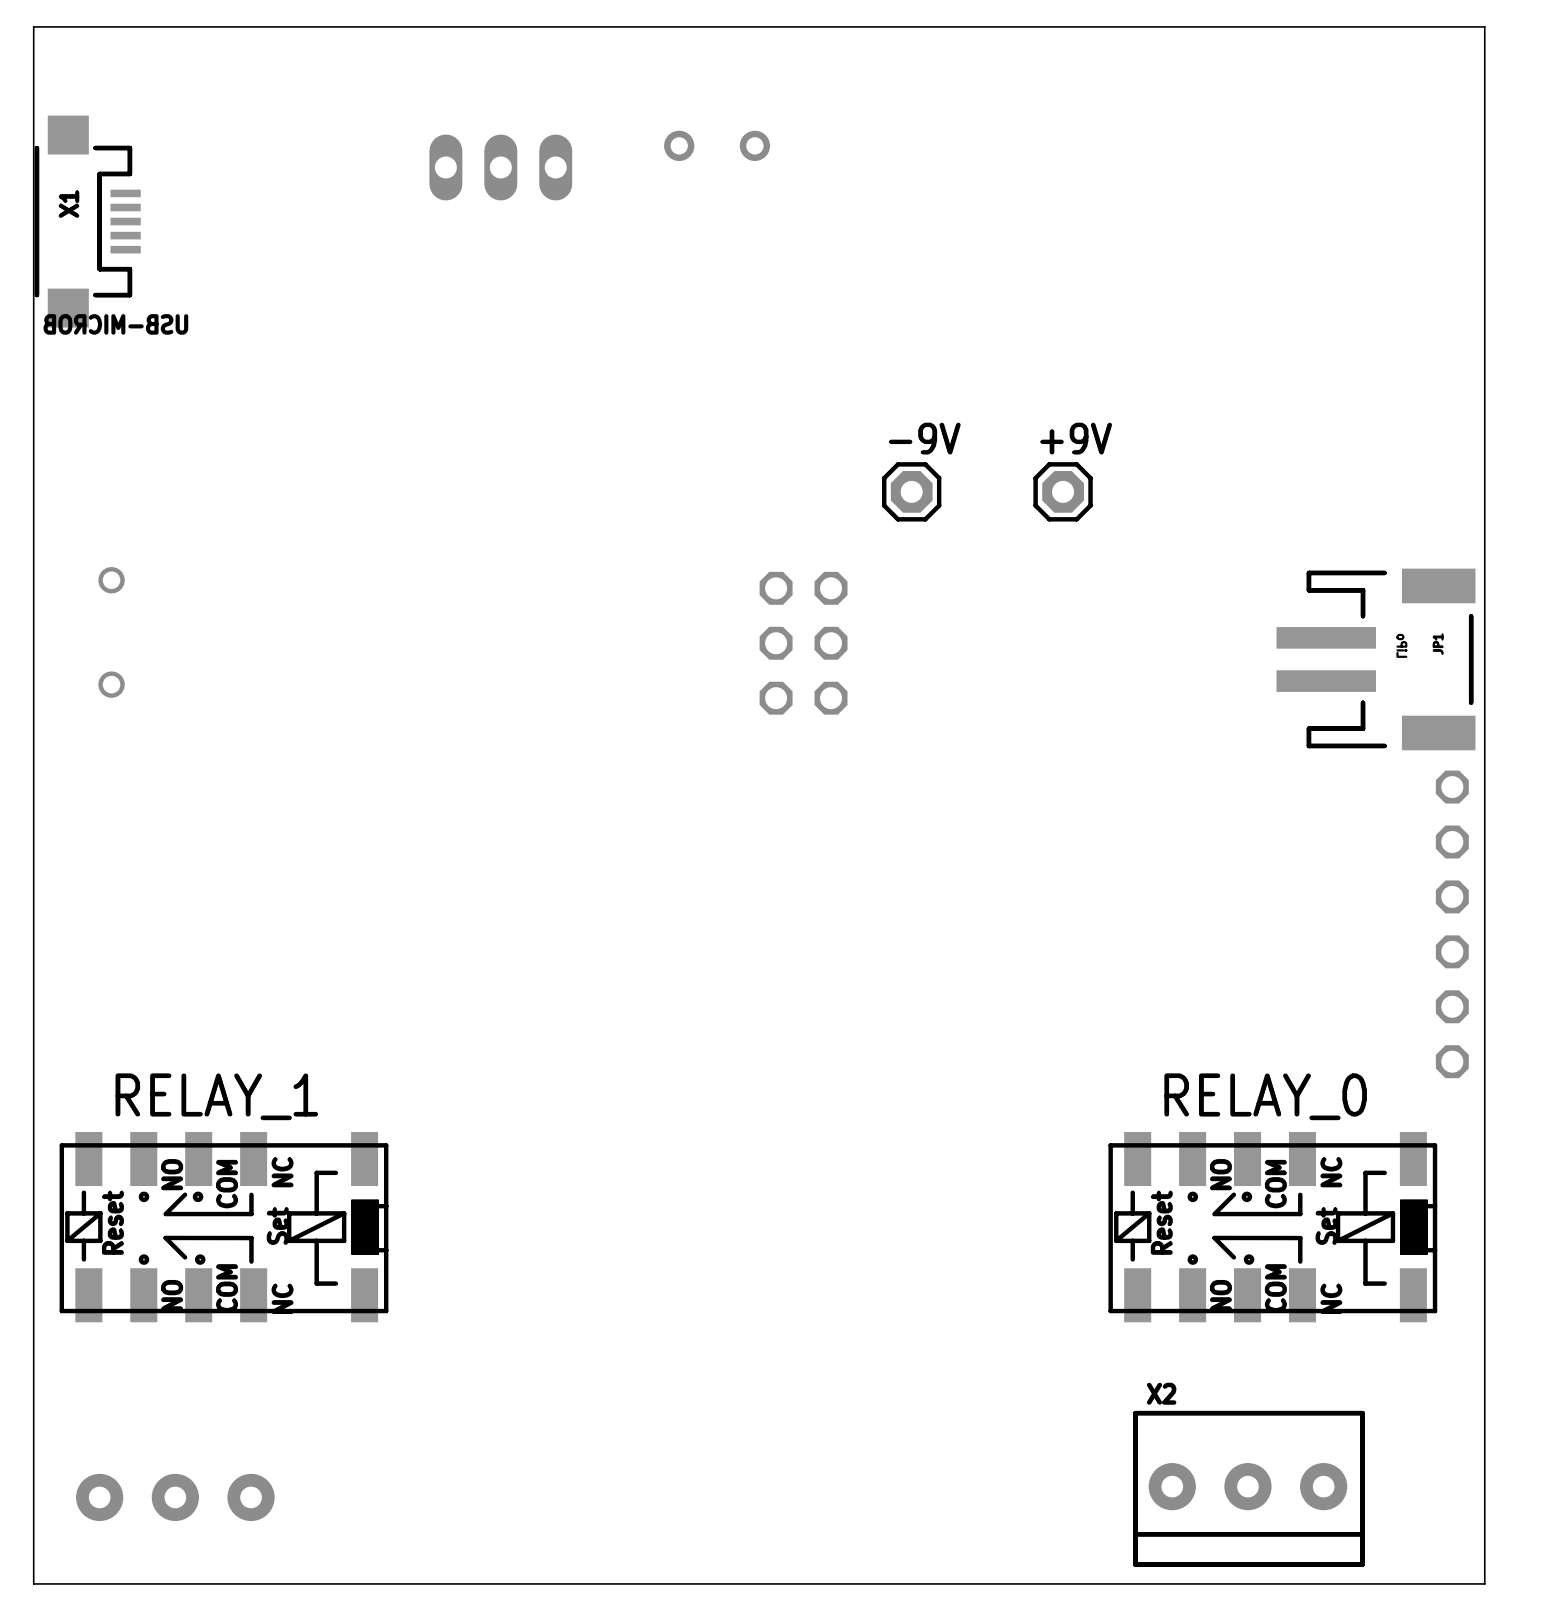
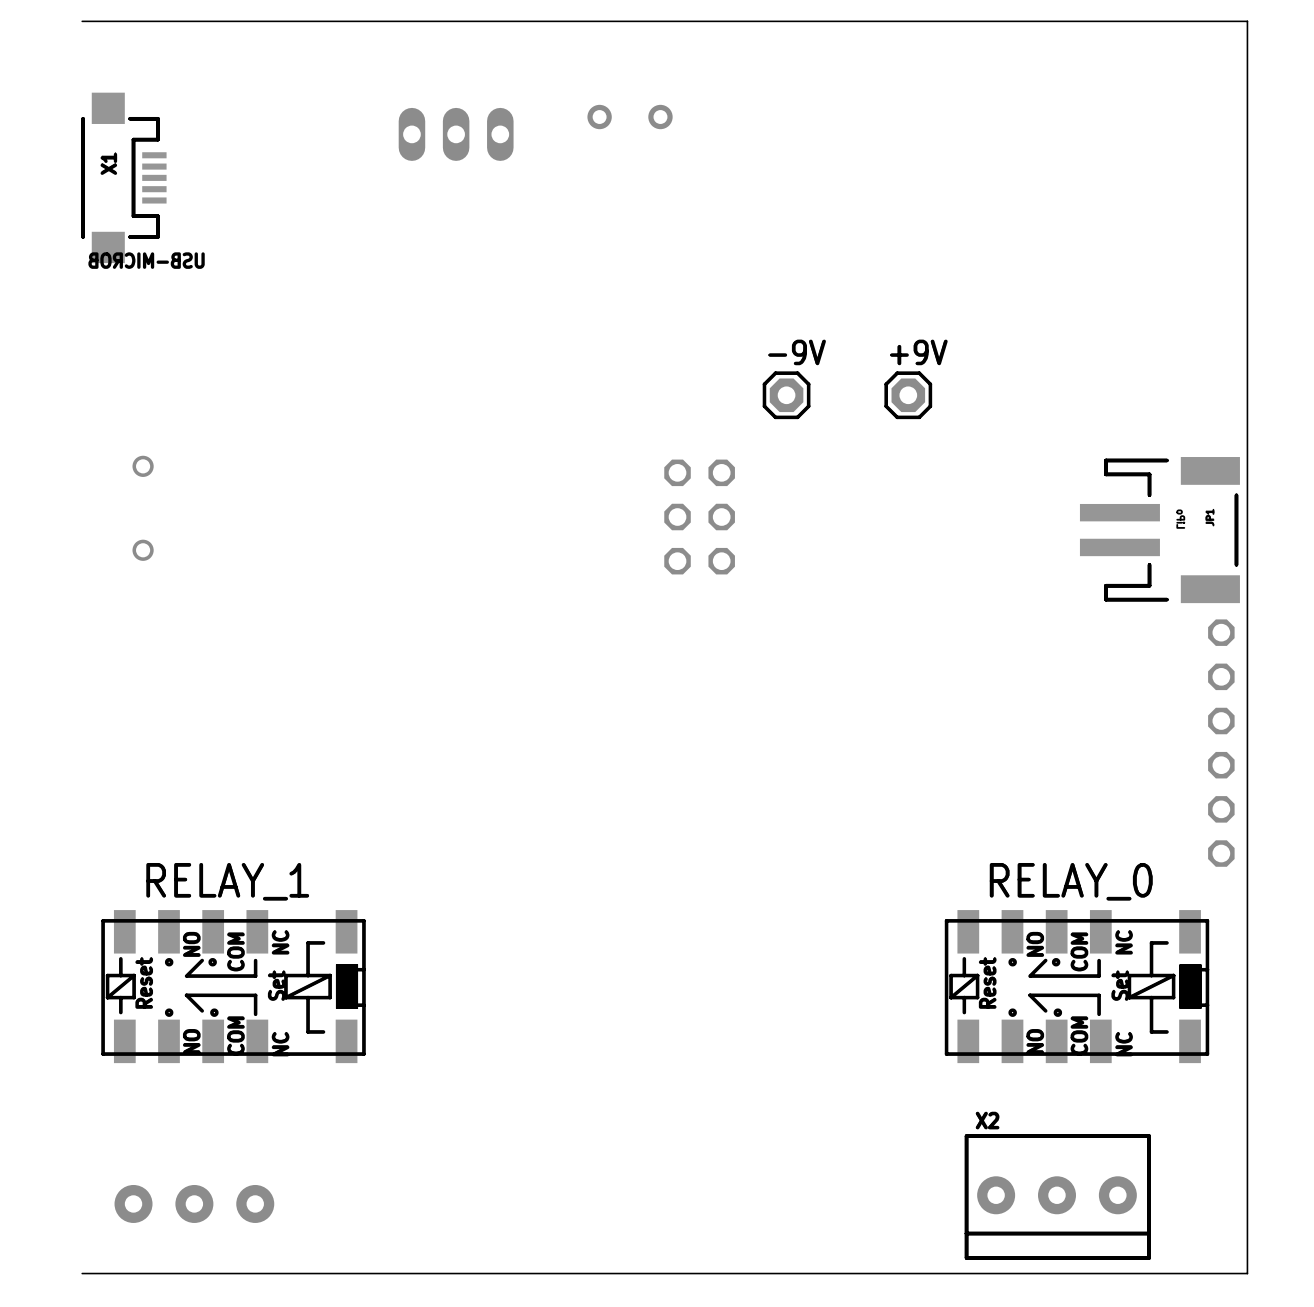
board edge: (35, 26) (33, 26) (33, 1583) (35, 1583) -> none

